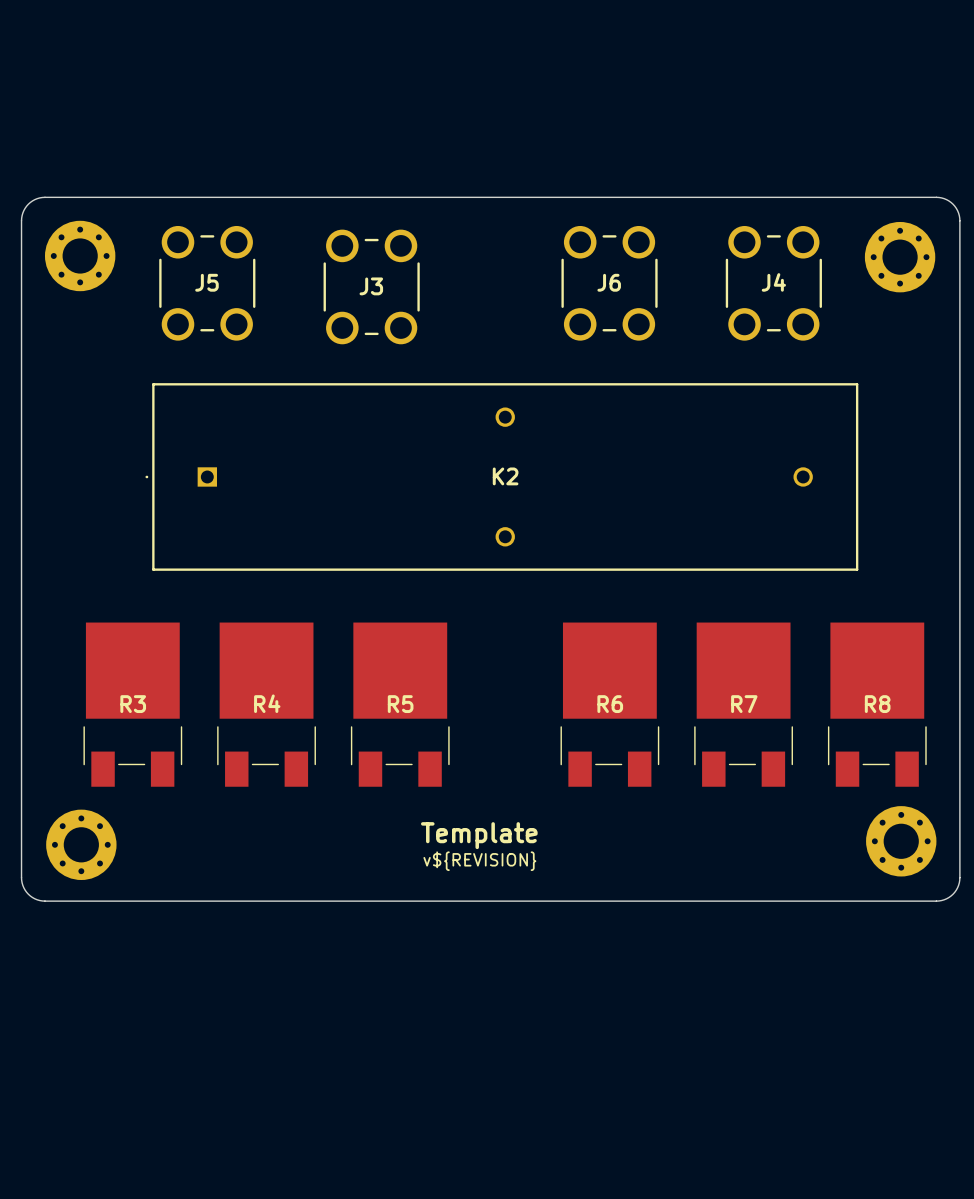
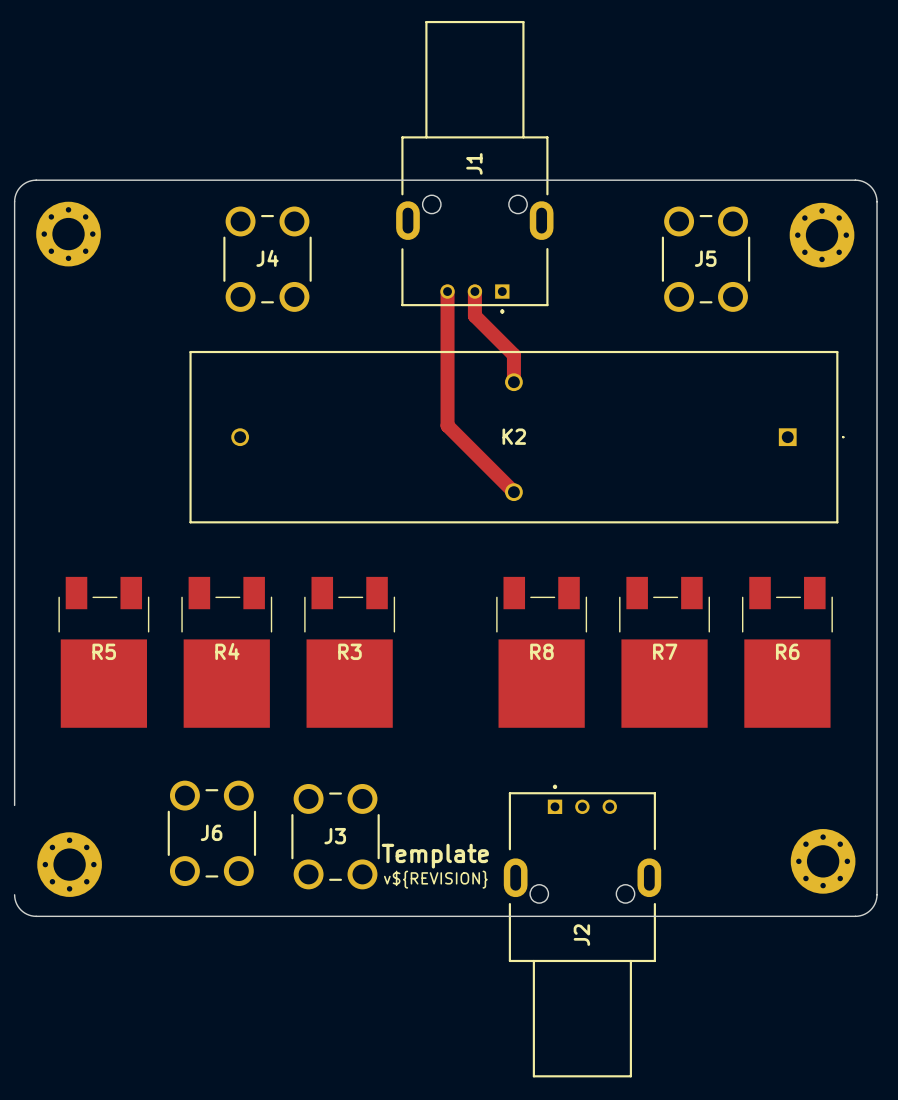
J1: none -> (474, 167)
J4 name: J4 (773, 282) -> J5 (705, 258)
J5: (207, 283) -> none
J4: none -> (267, 259)
J6 position: (609, 283) -> (211, 833)
J3 position: (371, 286) -> (335, 836)
top track: none -> (447, 291) (447, 425) (513, 492)
top track: none -> (474, 291) (474, 316) (513, 355) (513, 382)
K2 rotation: 0° (502, 476) -> 180° (516, 437)
R3 rotation: 0° (132, 704) -> 180° (349, 652)
R3 position: (132, 704) -> (349, 652)
R4 rotation: 0° (266, 704) -> 180° (226, 652)
R5 rotation: 0° (400, 704) -> 180° (103, 652)
R5 position: (400, 704) -> (103, 652)
R6 rotation: 0° (609, 704) -> 180° (787, 652)
R6 position: (609, 704) -> (787, 652)
R7 rotation: 0° (743, 704) -> 180° (664, 652)
R8 rotation: 0° (877, 704) -> 180° (541, 652)
R8 position: (877, 704) -> (541, 652)
text position: Template (479, 835) -> Template (435, 856)
part position: (901, 841) -> (823, 861)
part position: (81, 844) -> (69, 864)
text position: v${REVISION} (479, 861) -> v${REVISION} (435, 879)
board edge: (21, 877) (23, 887) (28, 894) (37, 899) (44, 901) (936, 901) (944, 899) (953, 894) (957, 887) (959, 877) -> (14, 894) (15, 901) (20, 910) (26, 914) (36, 916) (857, 916) (870, 910) (876, 899) (877, 805)
J2: none -> (582, 931)

